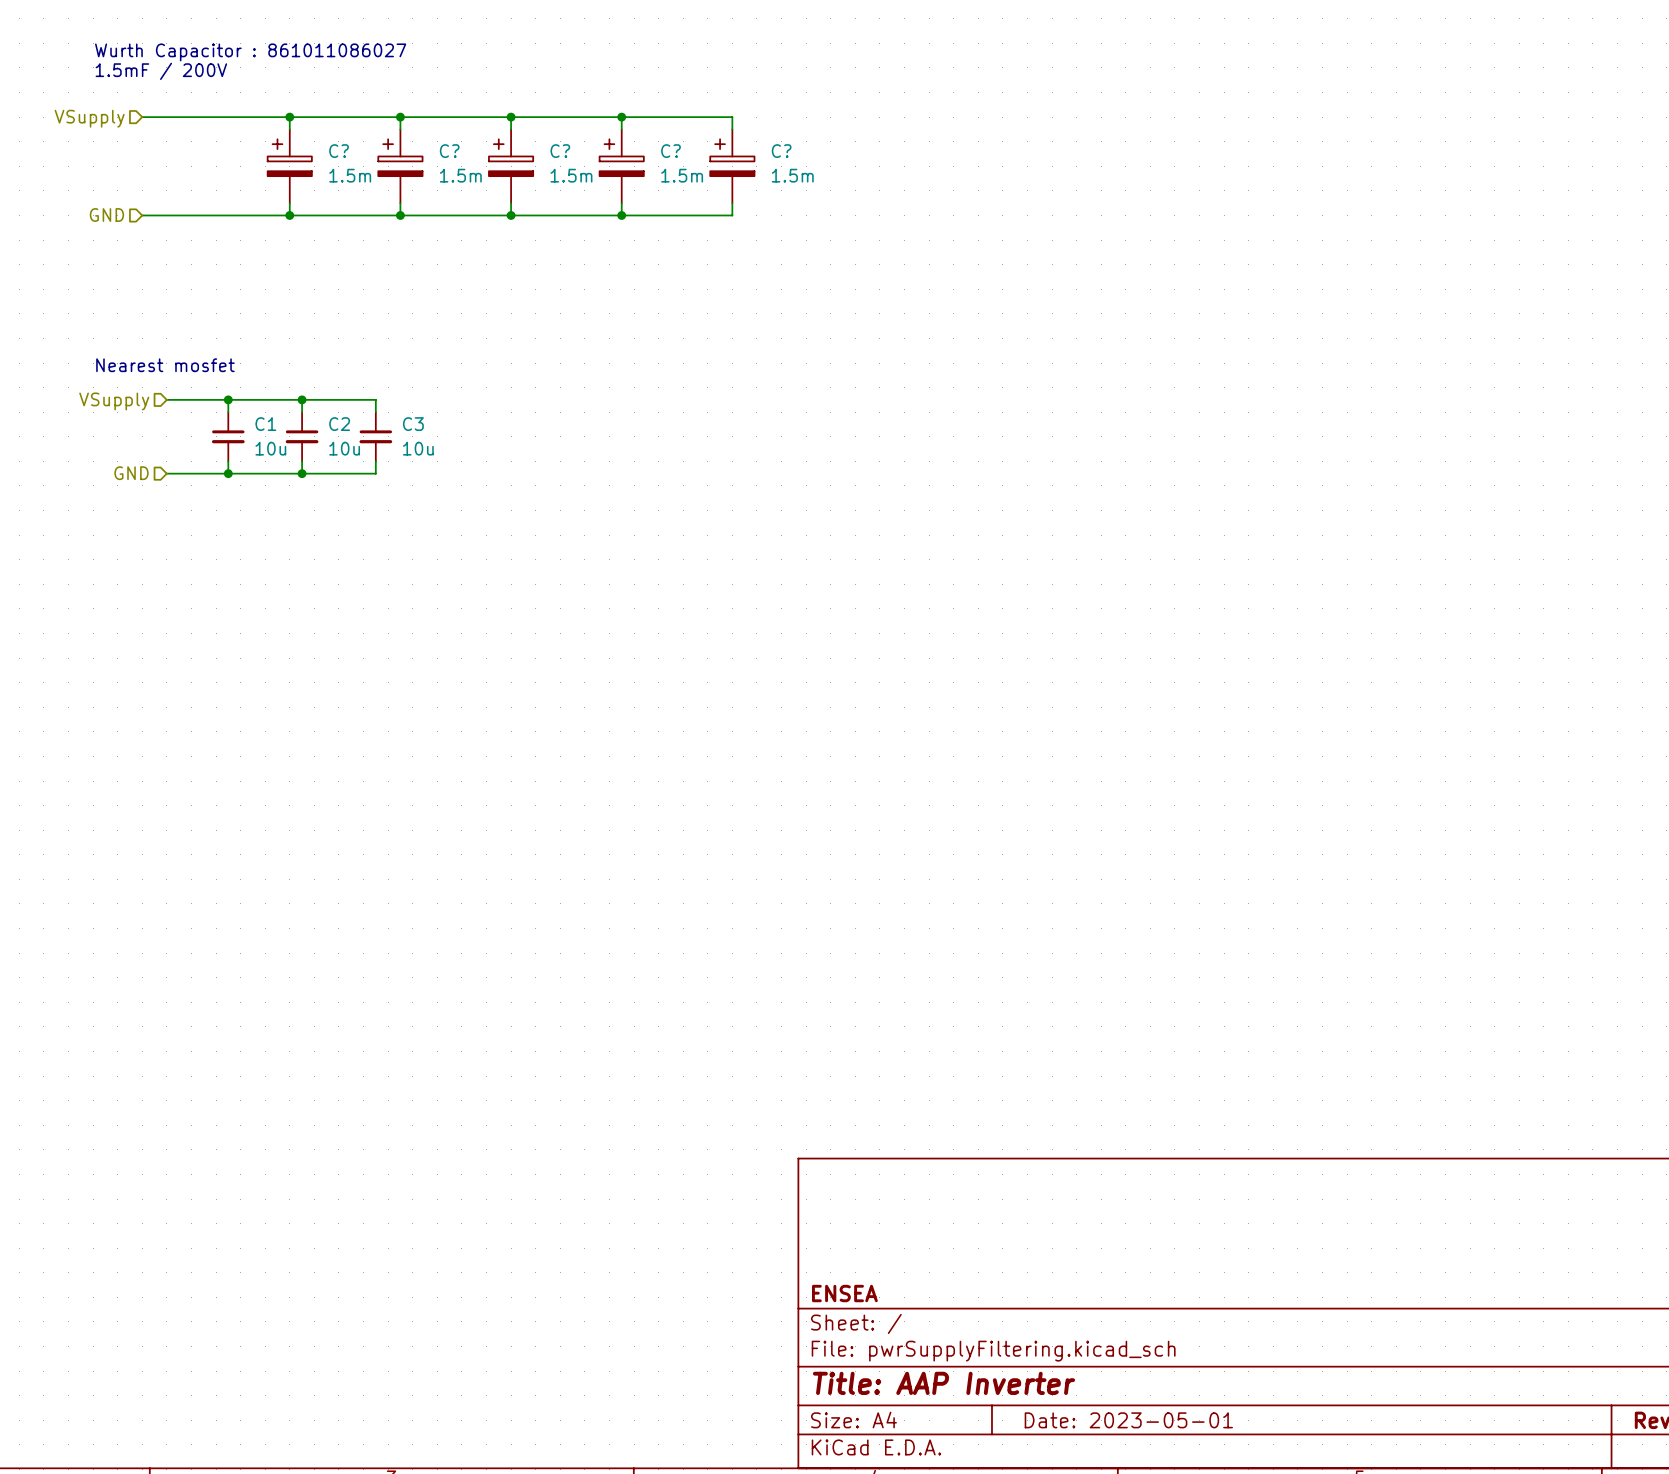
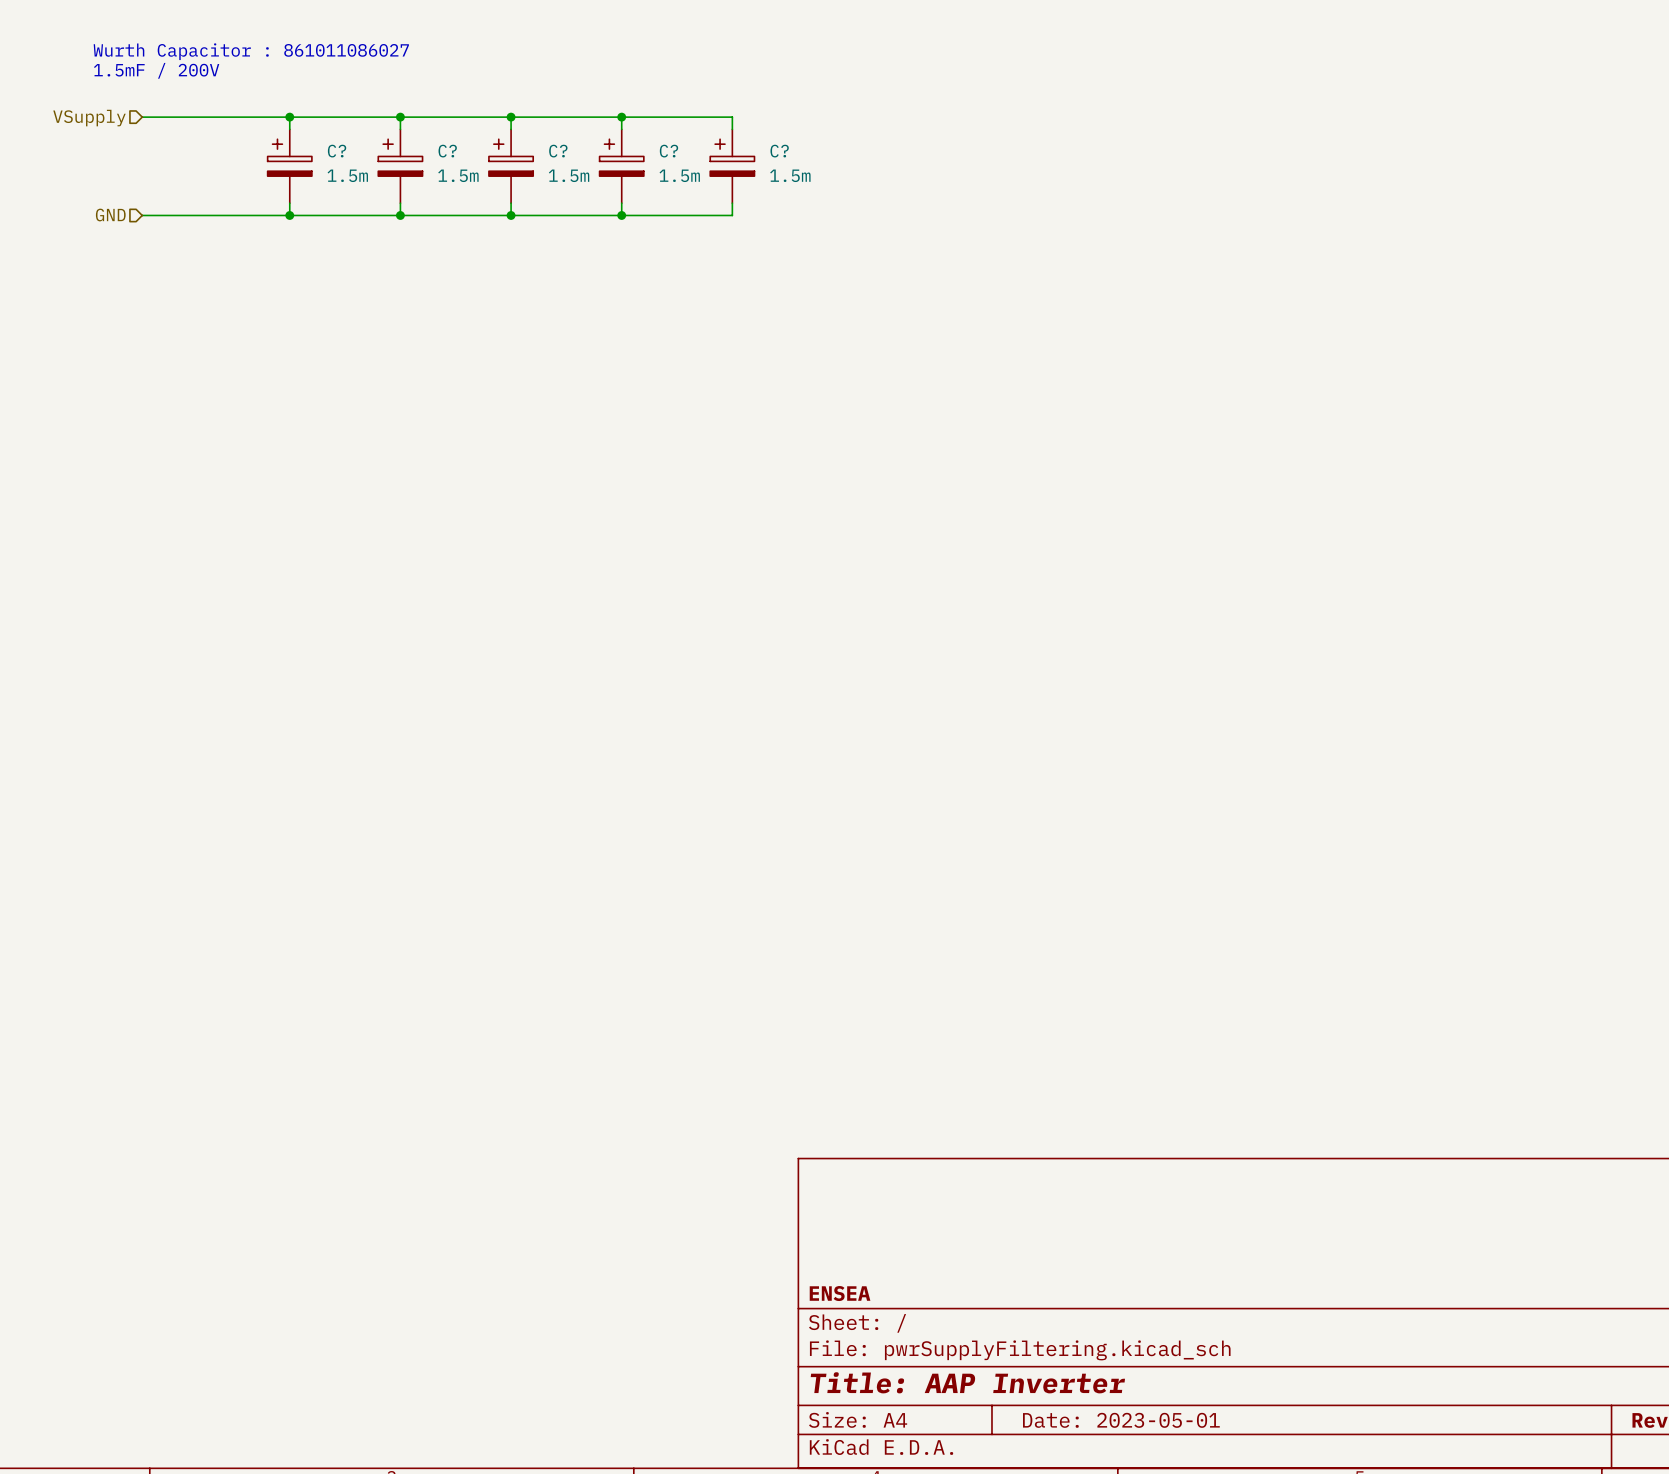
text: Nearest mosfet (165, 365) -> none
wire: (166, 399) (375, 399) (375, 412) -> none
wire: (228, 399) (228, 412) -> none
junction: (228, 399) -> none
wire: (302, 399) (302, 412) -> none
junction: (302, 399) -> none
hierarchical label: VSupply (114, 401) -> none
C1: 10u (228, 436) -> none
C2: 10u (302, 436) -> none
C3: 10u (375, 436) -> none
wire: (228, 461) (228, 473) -> none
wire: (302, 461) (302, 473) -> none
wire: (375, 461) (375, 473) (166, 473) -> none
hierarchical label: GND (131, 473) -> none
junction: (228, 473) -> none
junction: (302, 473) -> none

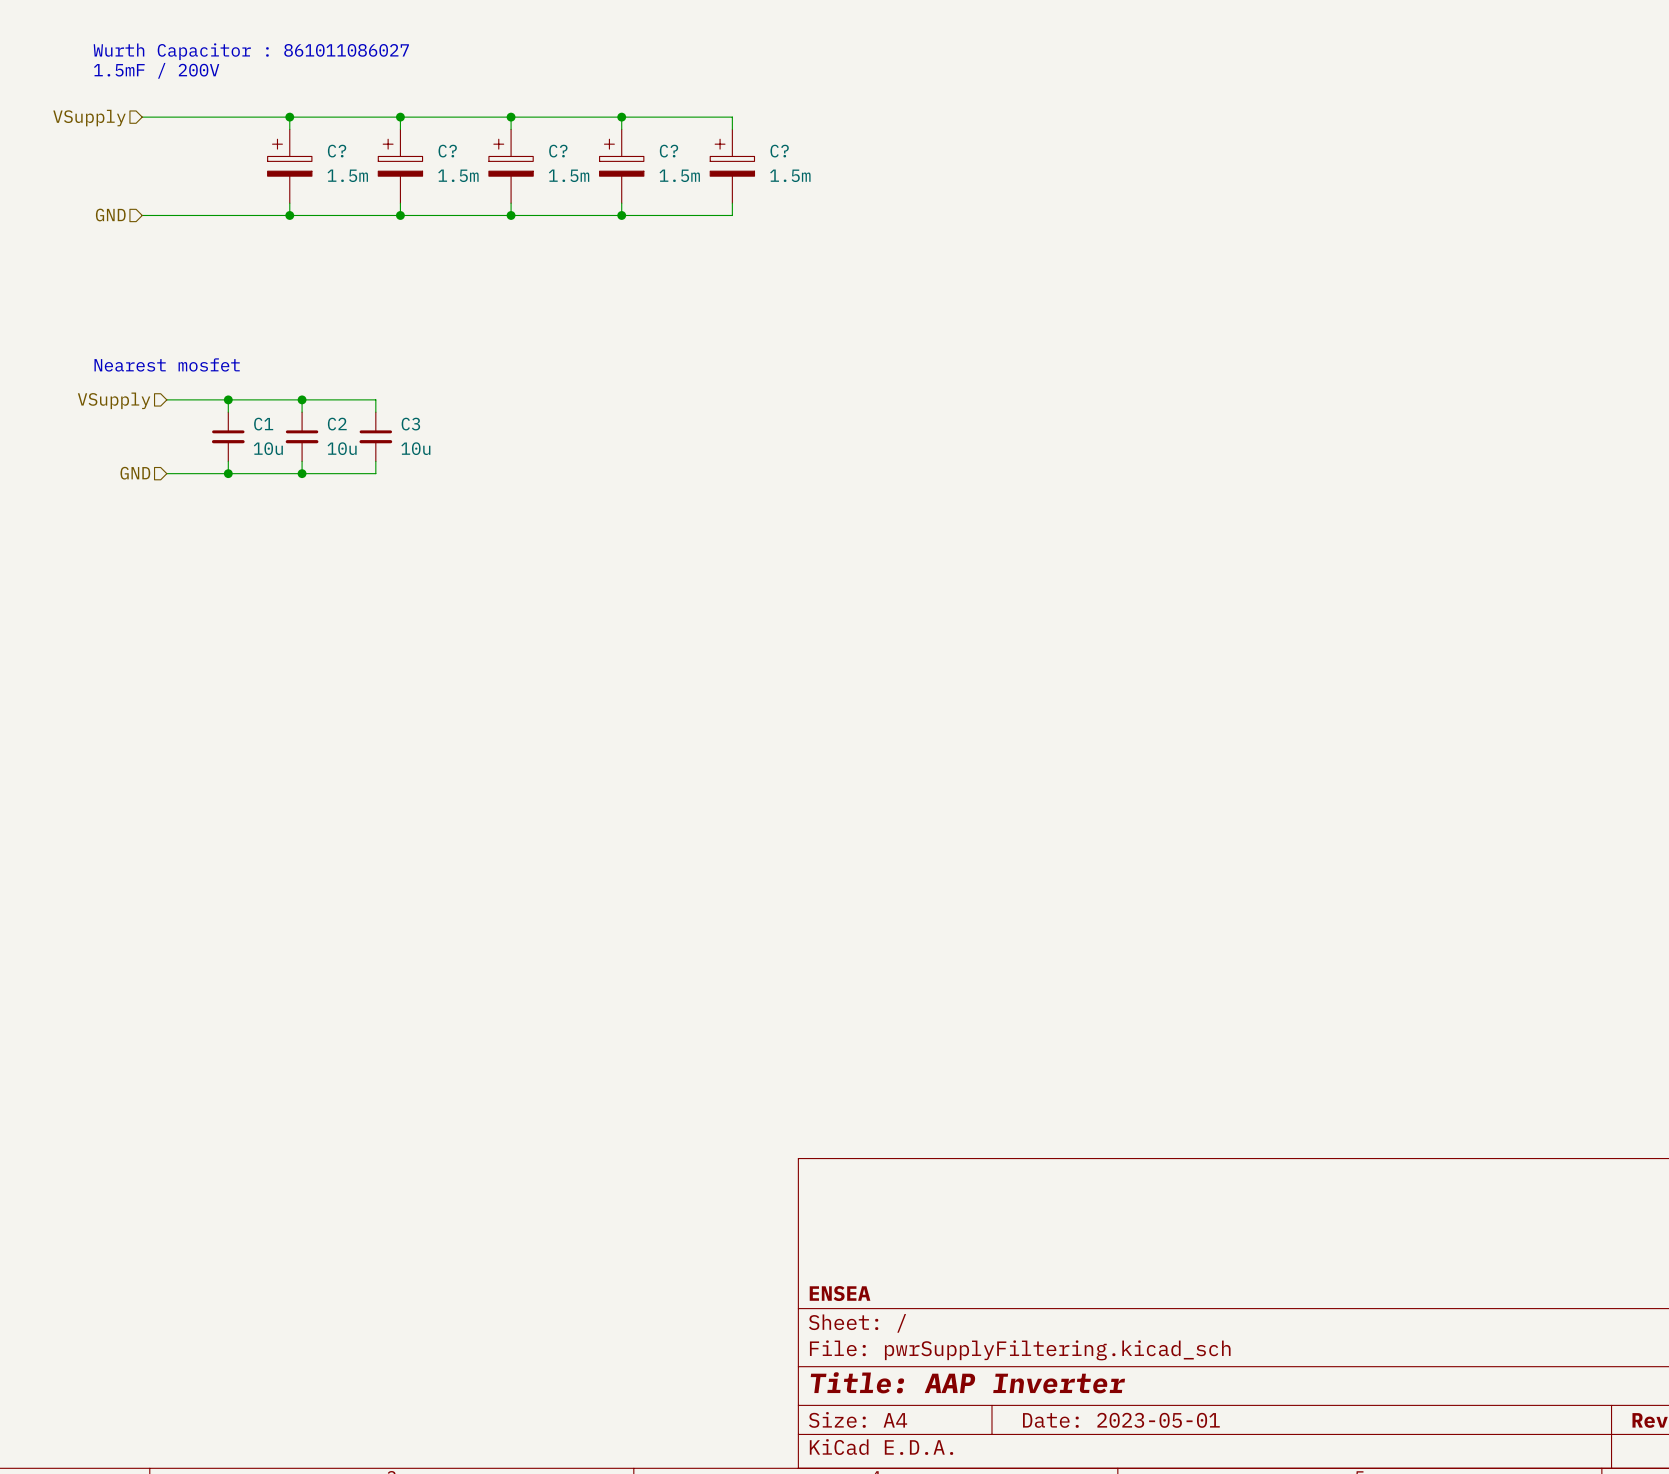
text: none -> Nearest mosfet (167, 364)
wire: none -> (166, 399) (375, 399) (375, 412)
wire: none -> (228, 399) (228, 412)
junction: none -> (228, 399)
wire: none -> (302, 399) (302, 412)
junction: none -> (302, 399)
hierarchical label: none -> VSupply (114, 400)
C1: none -> 10u (228, 436)
C2: none -> 10u (302, 436)
C3: none -> 10u (375, 436)
wire: none -> (228, 461) (228, 473)
wire: none -> (302, 461) (302, 473)
wire: none -> (375, 461) (375, 473) (166, 473)
hierarchical label: none -> GND (135, 473)
junction: none -> (228, 473)
junction: none -> (302, 473)

